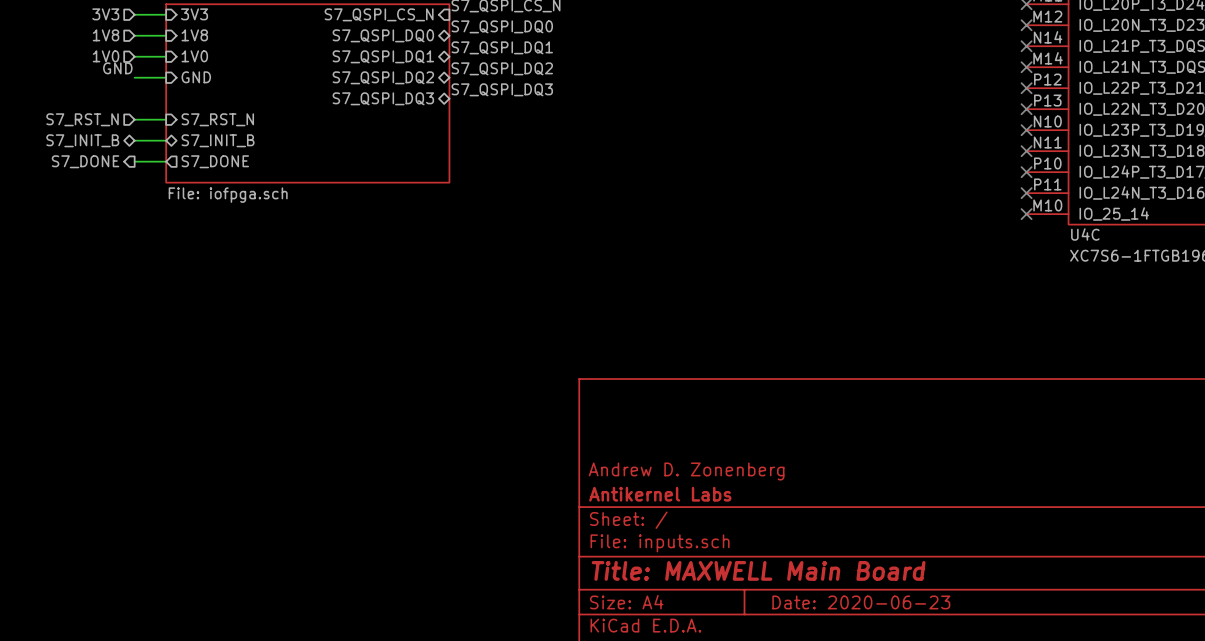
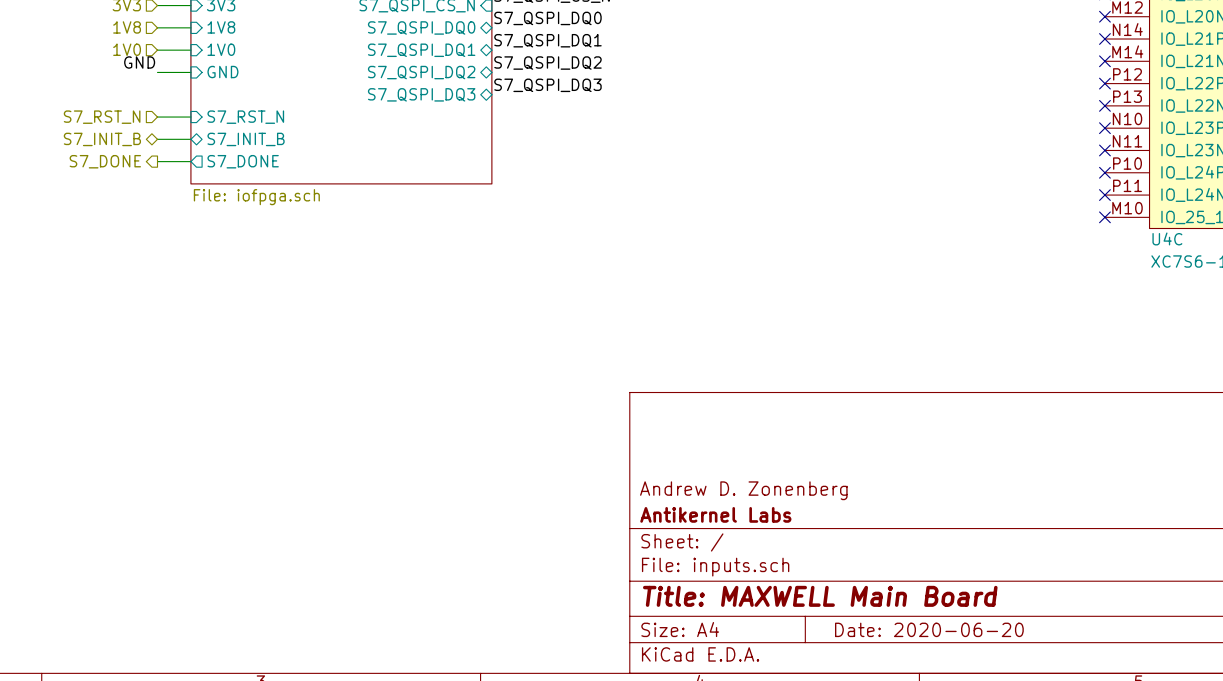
title block: Date: 2020-06-23 (861, 602) -> Date: 2020-06-20 (929, 629)

